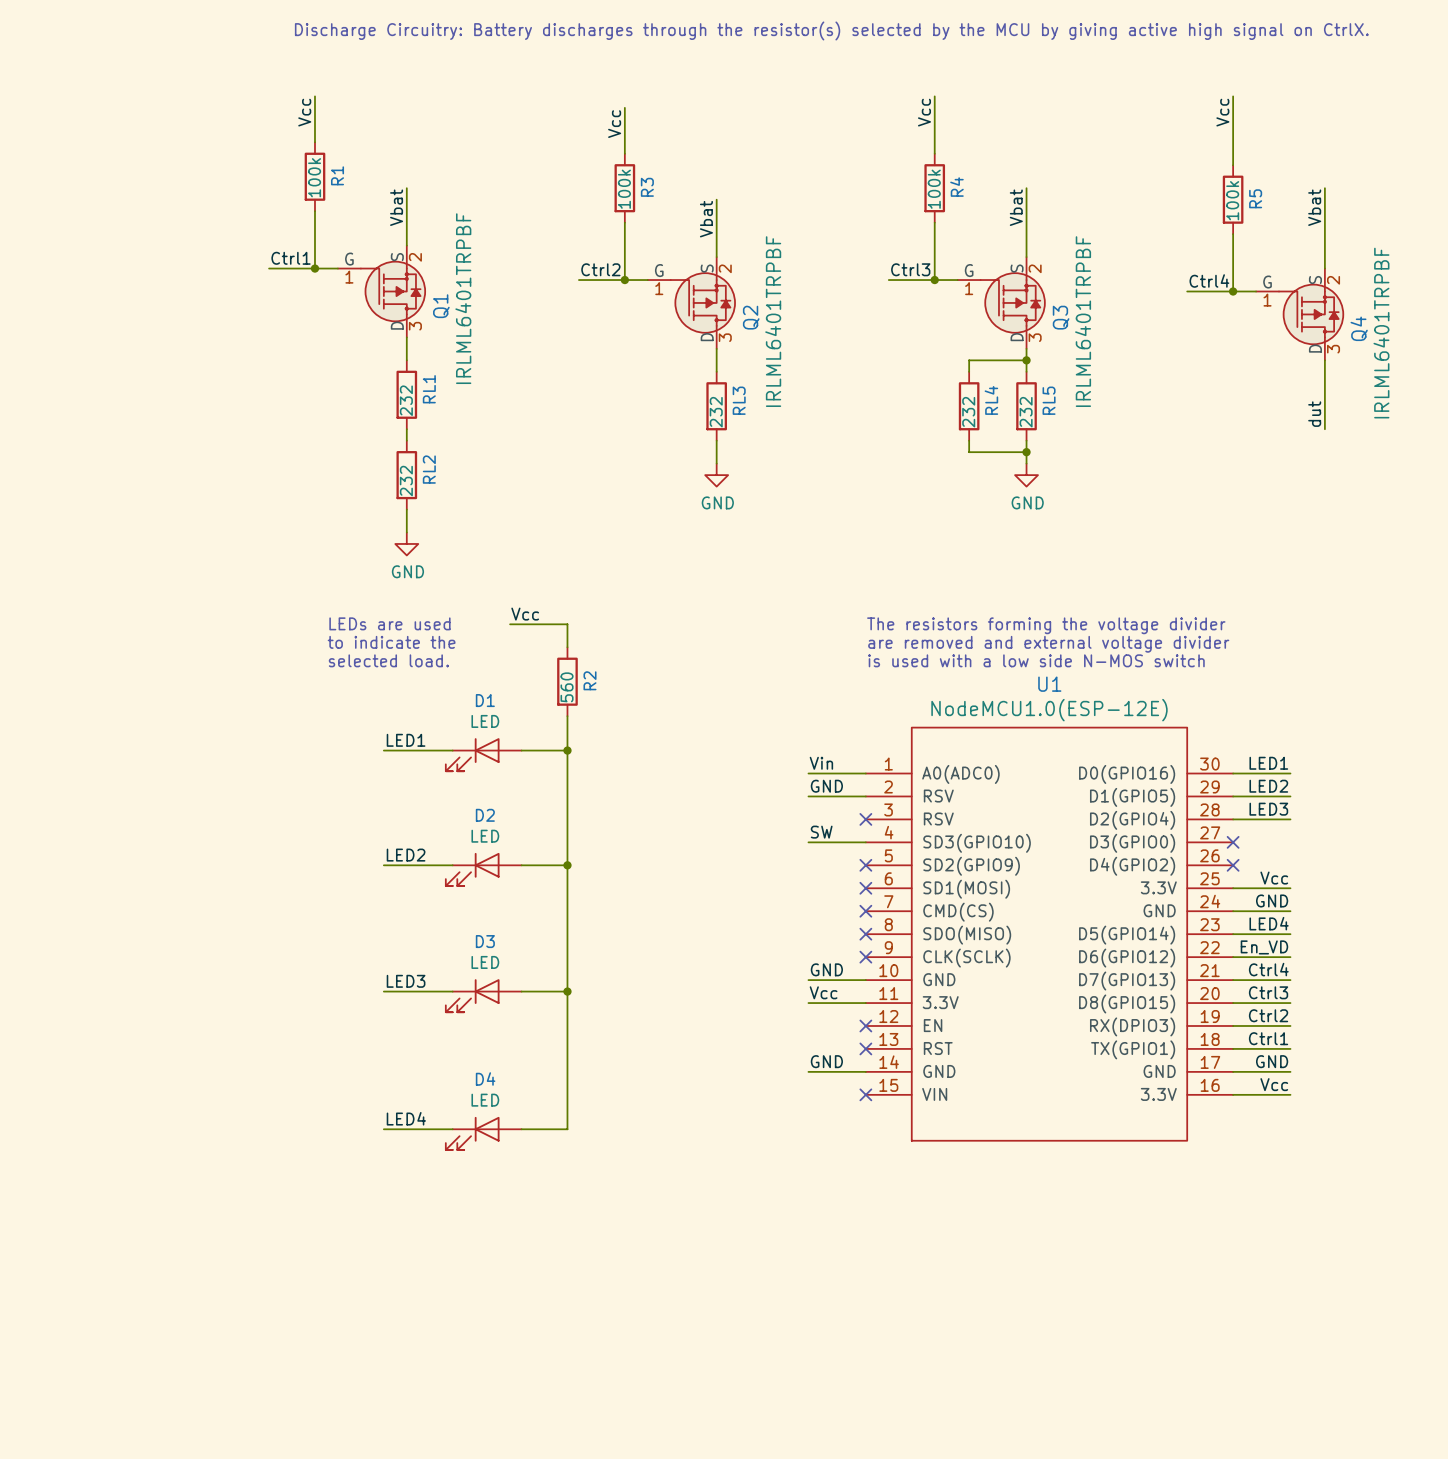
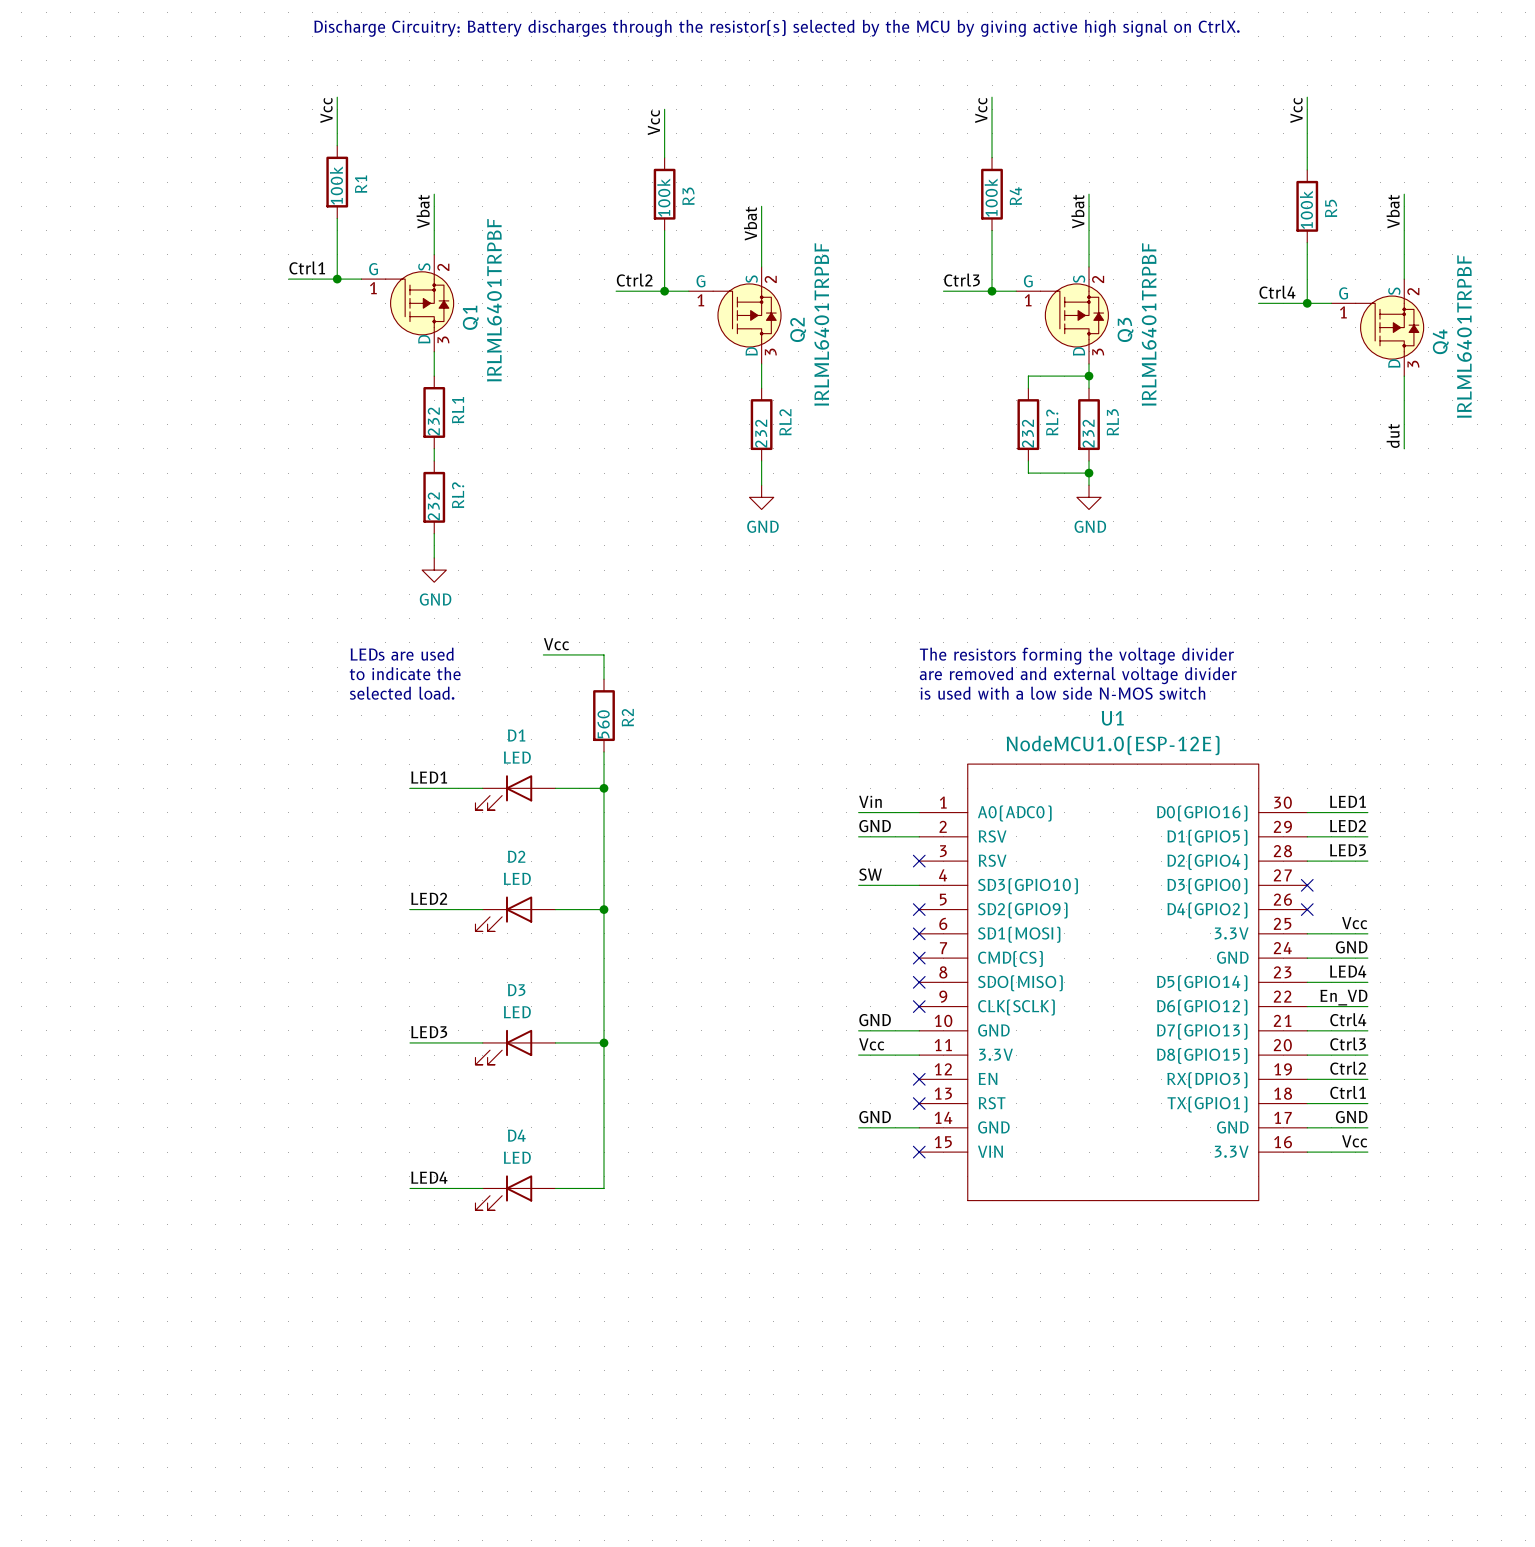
RL3 name: RL3 (739, 400) -> RL2 (785, 422)
RL4 name: RL4 (991, 400) -> RL? (1052, 422)
RL5 name: RL5 (1049, 400) -> RL3 (1112, 422)
RL2 name: RL2 (429, 469) -> RL? (458, 495)

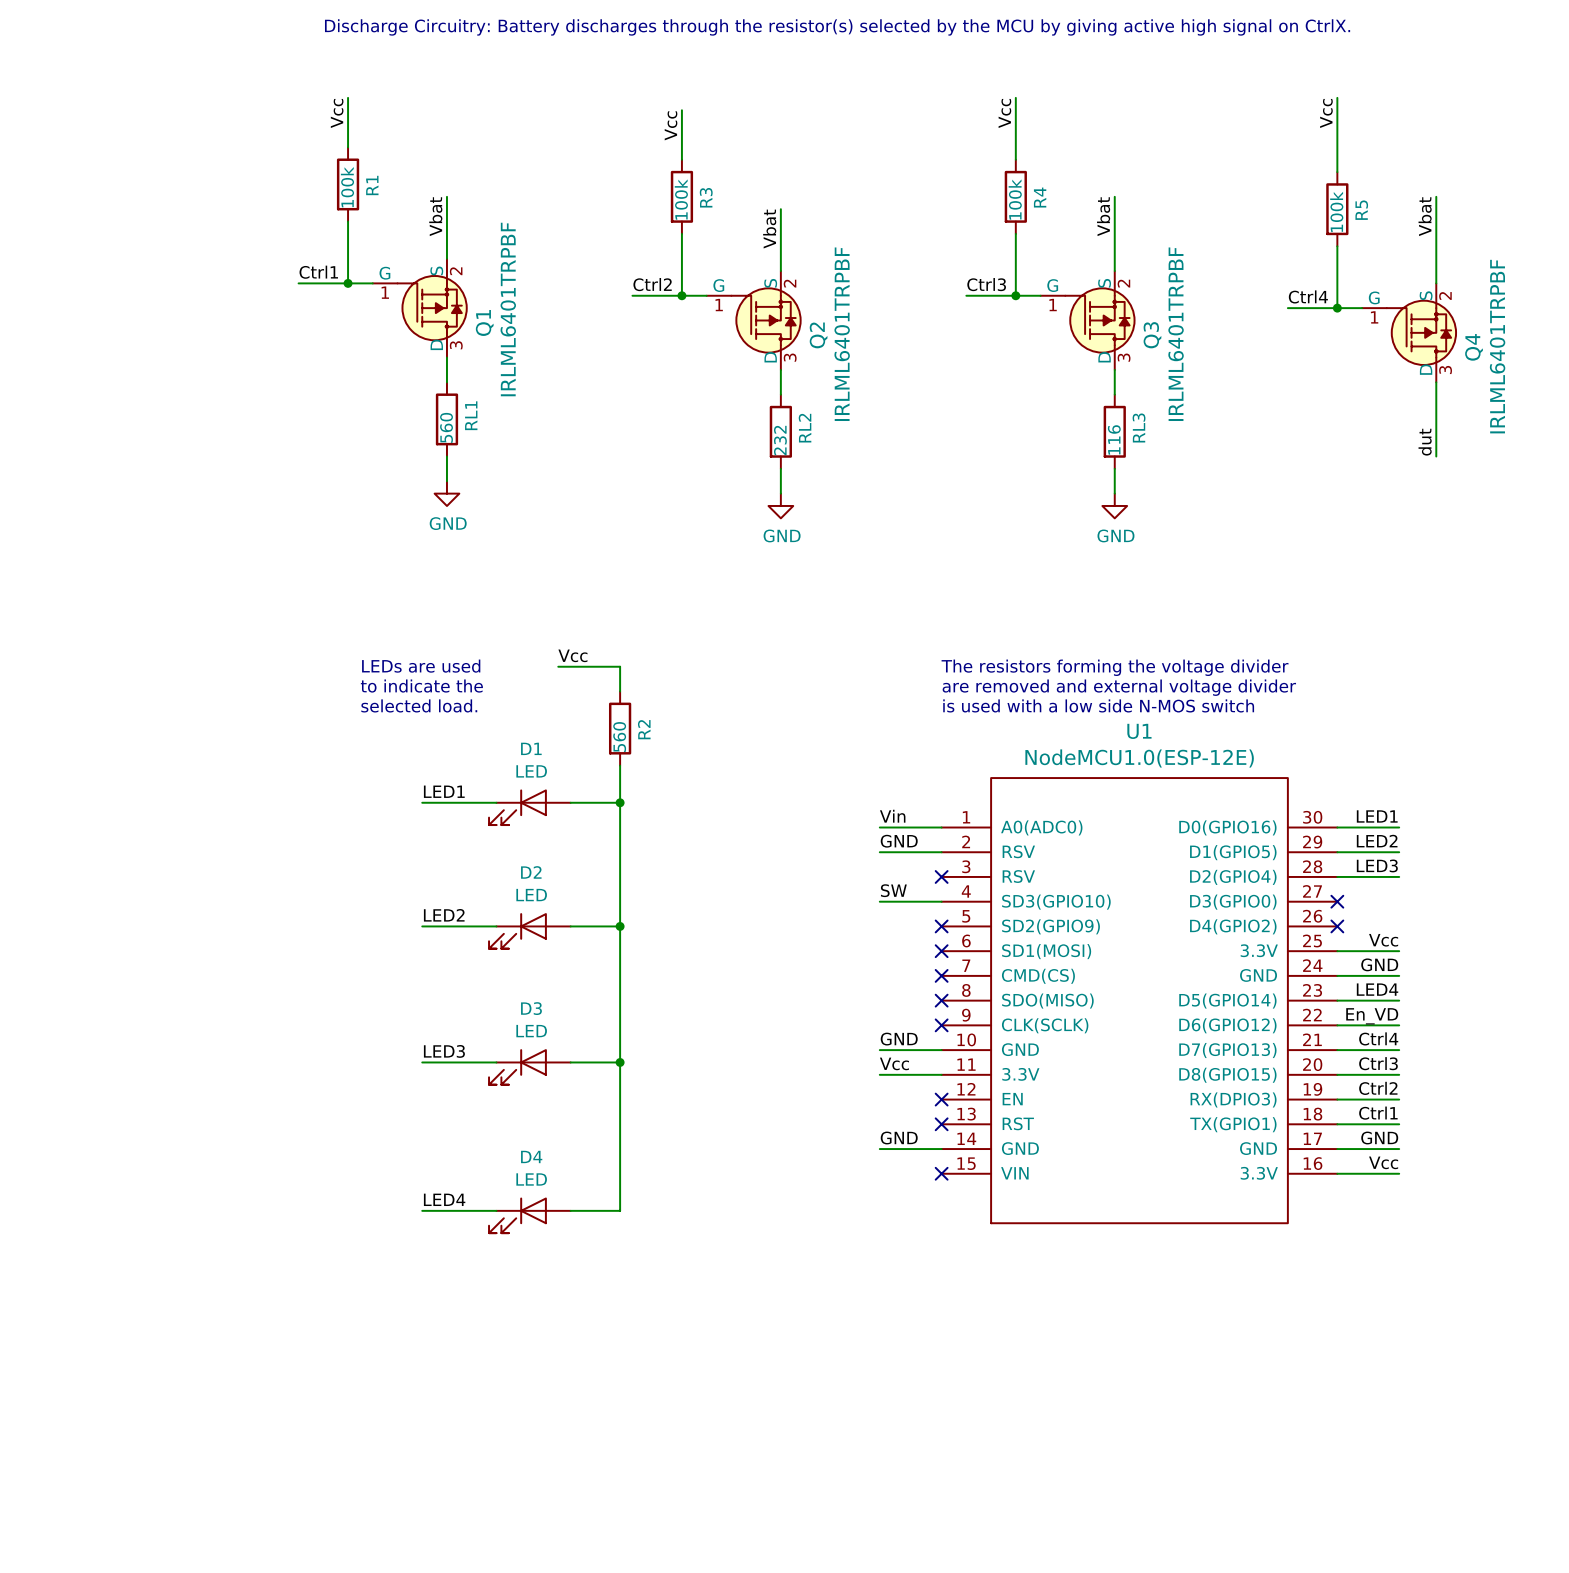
wire: (1089, 376) (1028, 376) (1028, 388) -> none
junction: (1089, 376) -> none
RL1 value: 232 (433, 421) -> 560 (446, 427)
RL?: 232 (1028, 424) -> none
RL3 value: 232 (1088, 433) -> 116 (1114, 439)
wire: (1028, 460) (1028, 473) (1089, 473) -> none
junction: (1089, 473) -> none
RL?: 232 (434, 497) -> none
wire: (434, 533) (434, 557) -> none
power symbol position: GND (434, 570) -> GND (446, 493)

